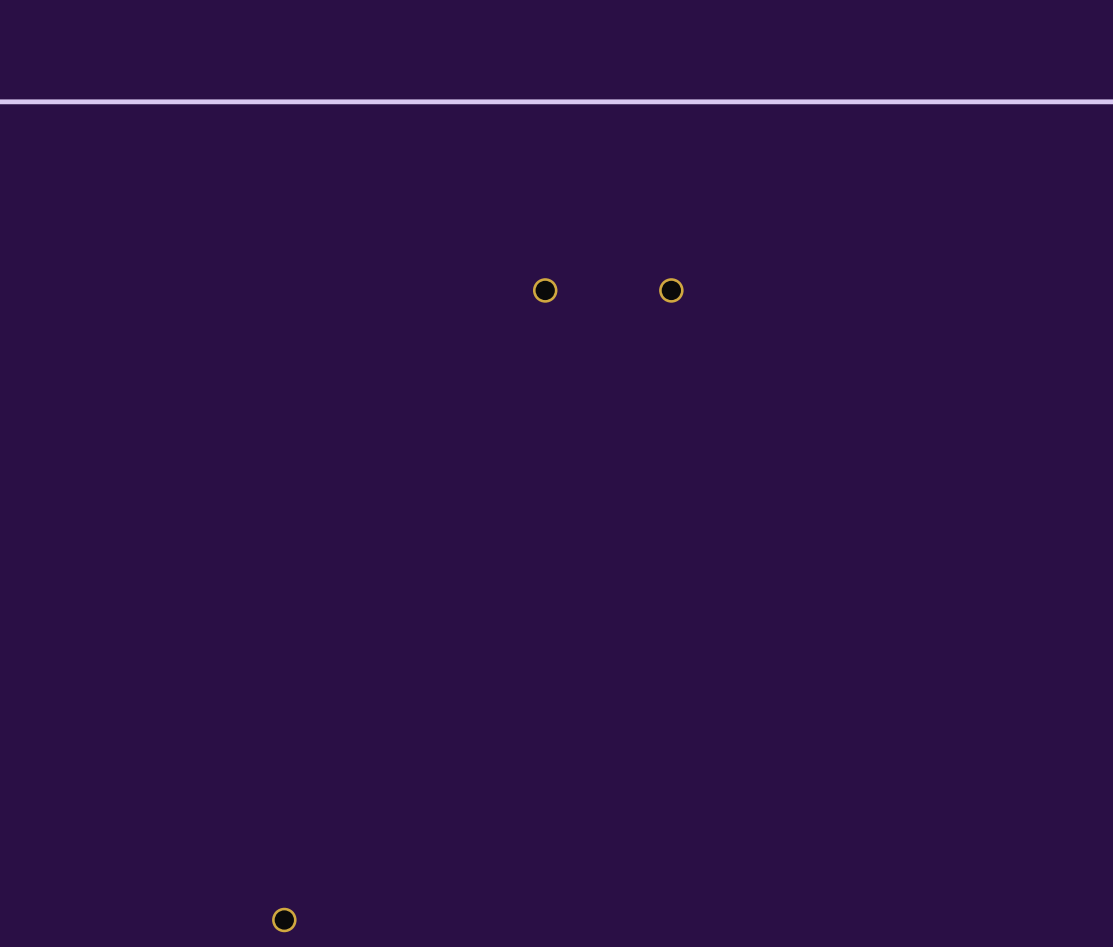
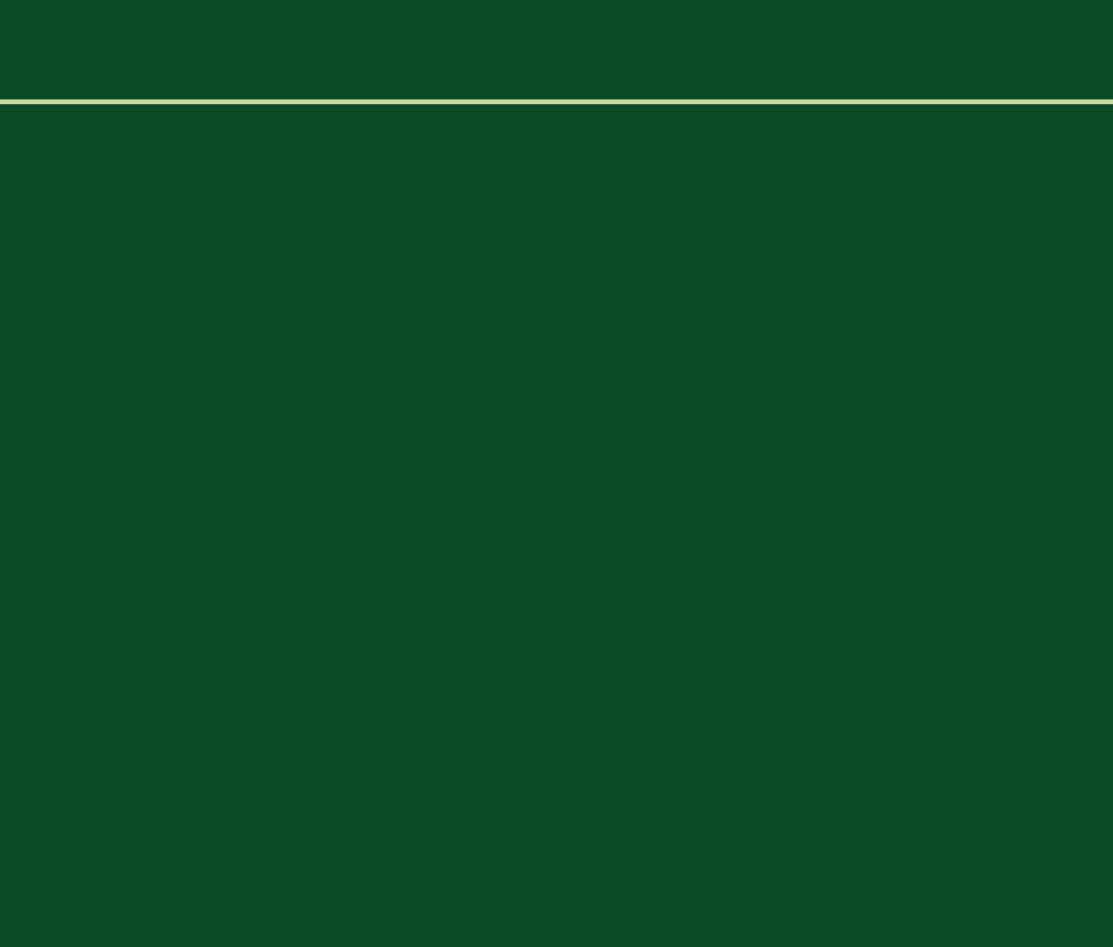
via: (545, 290) -> none
via: (671, 290) -> none
via: (284, 919) -> none

